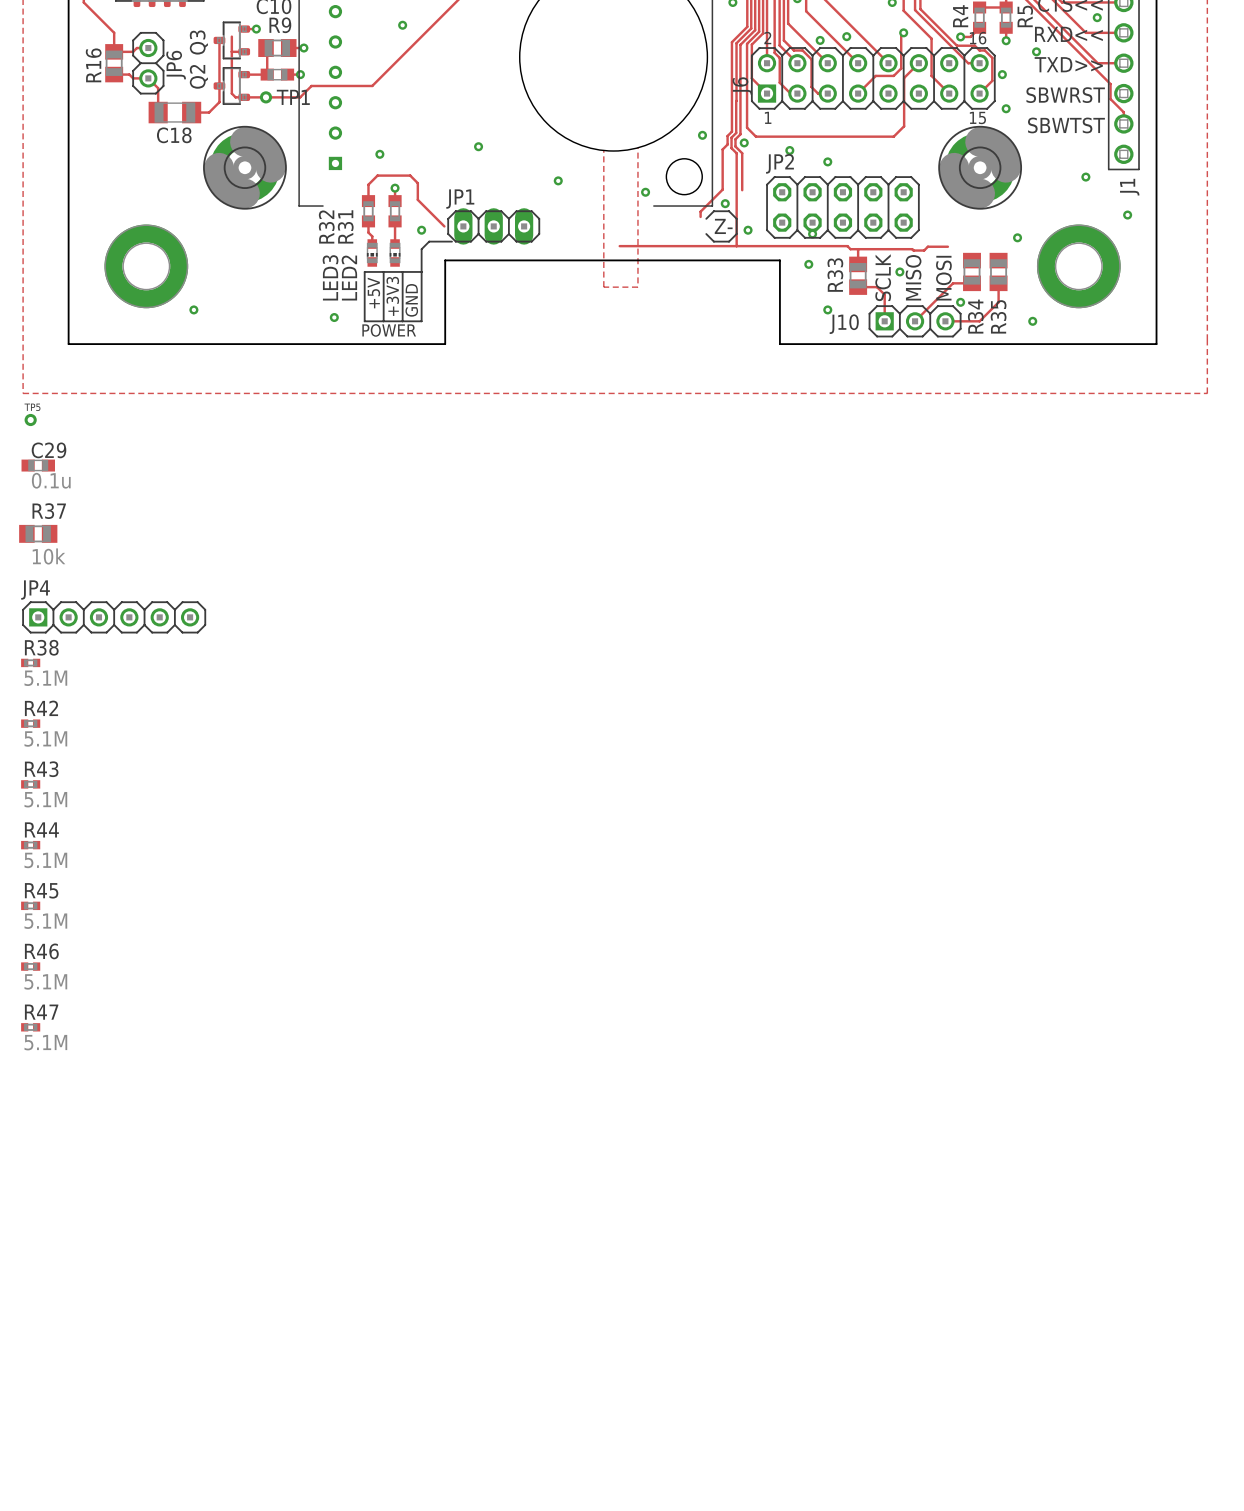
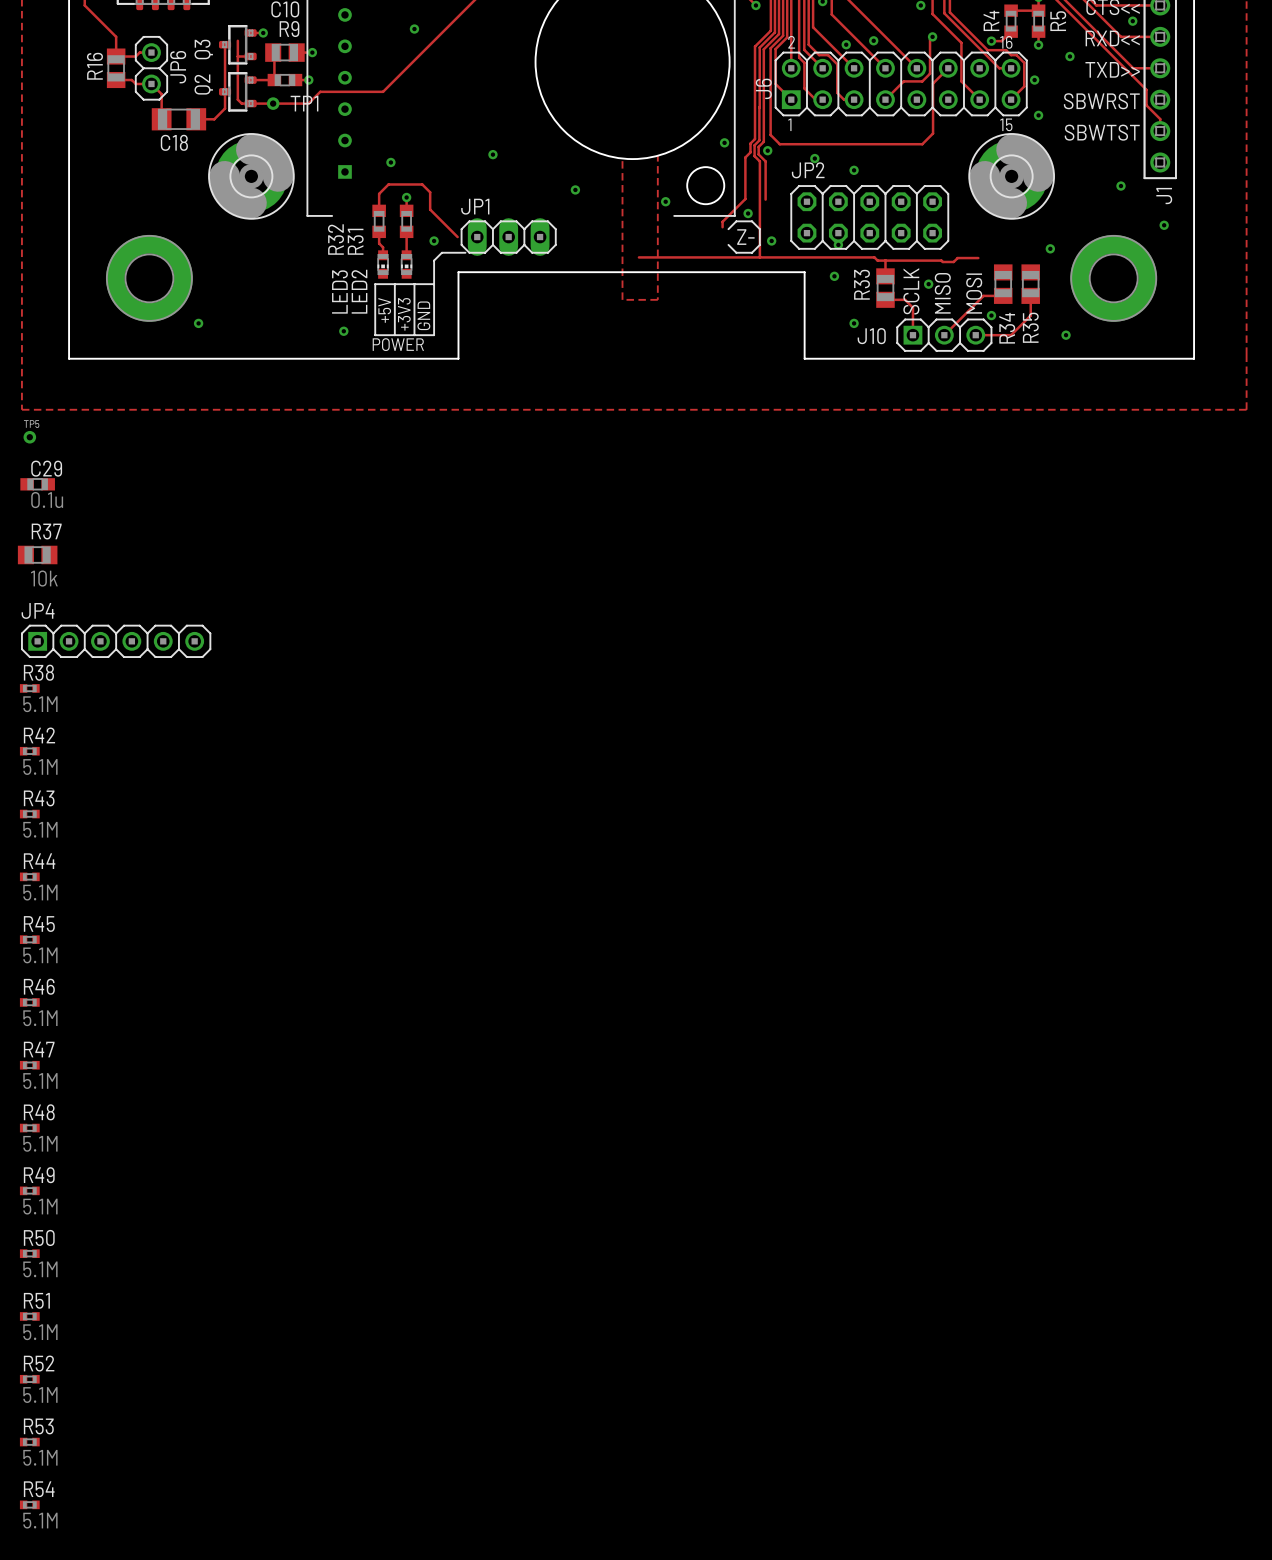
R48: none -> 5.1M (29, 1128)
R49: none -> 5.1M (29, 1190)
R50: none -> 5.1M (29, 1253)
R51: none -> 5.1M (29, 1316)
R52: none -> 5.1M (29, 1379)
R53: none -> 5.1M (29, 1442)
R54: none -> 5.1M (29, 1504)

